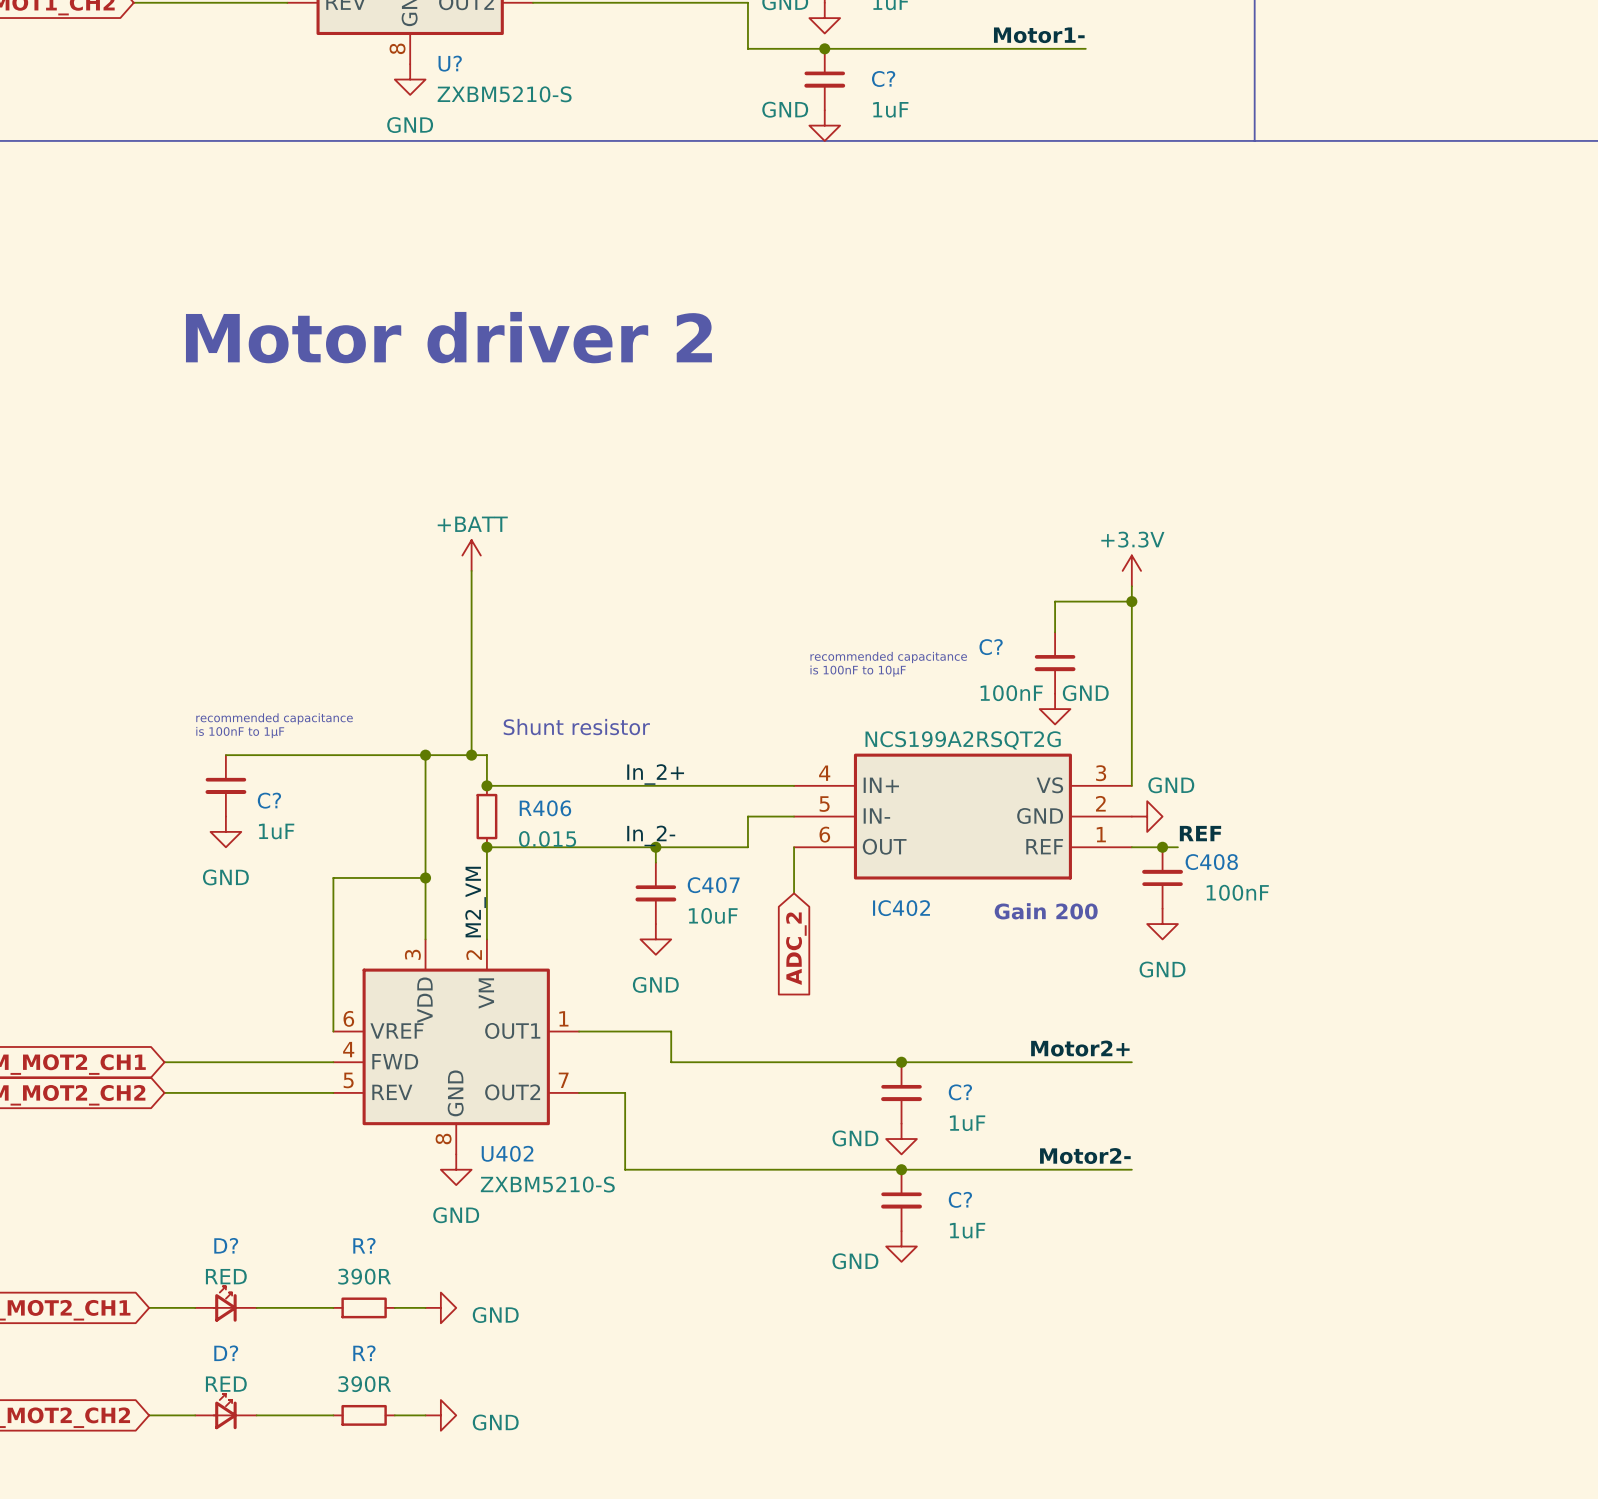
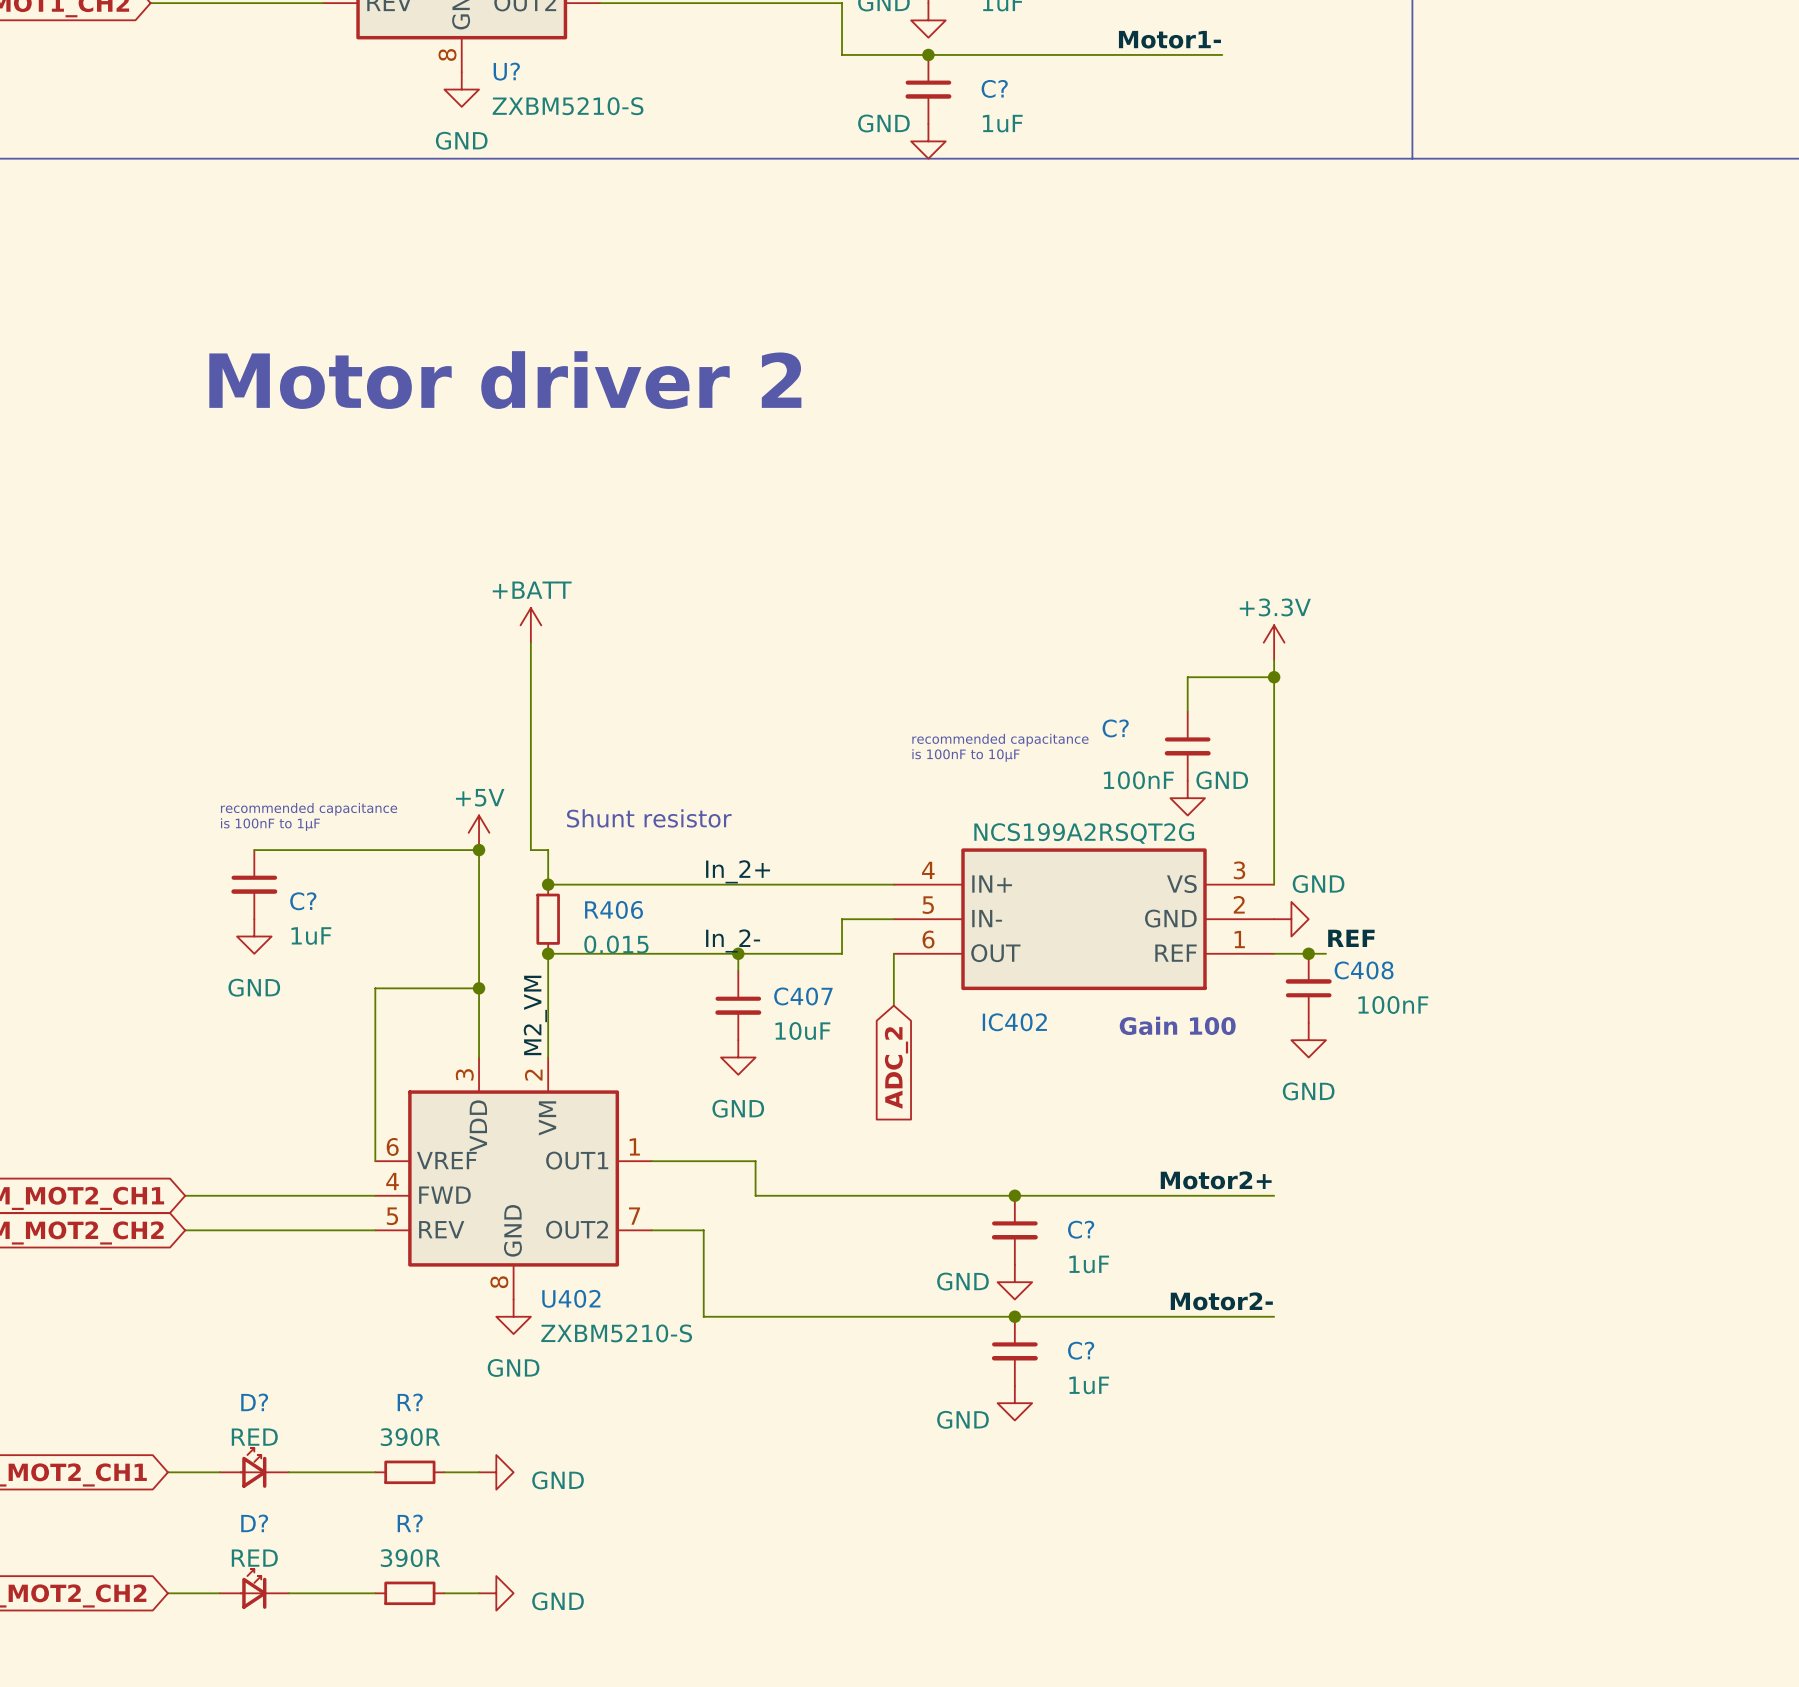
power symbol: none -> +5V (479, 832)
wire: (425, 755) (471, 755) -> none
junction: (471, 755) -> none
text: Gain 200 (1046, 911) -> Gain 100 (1177, 1025)

